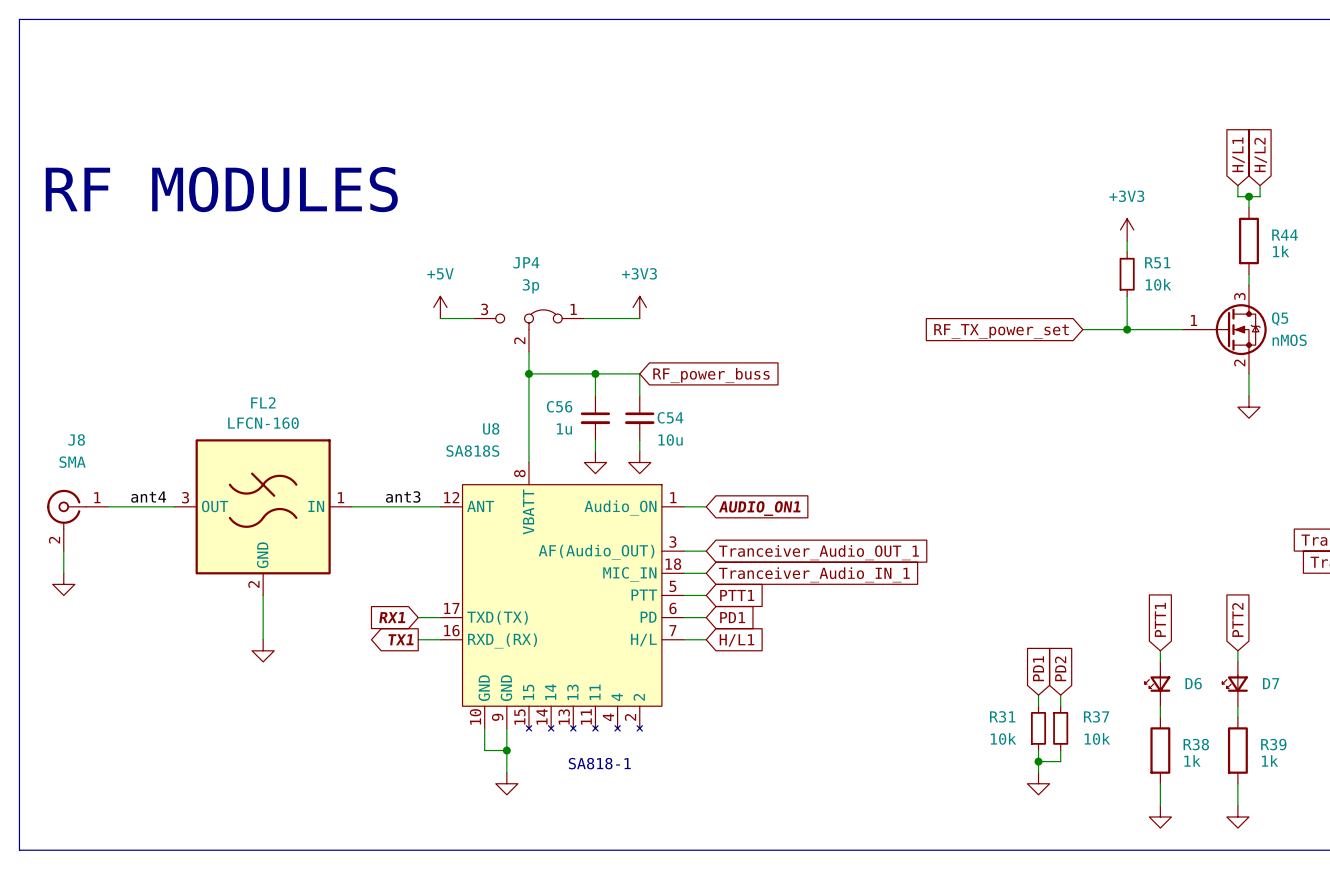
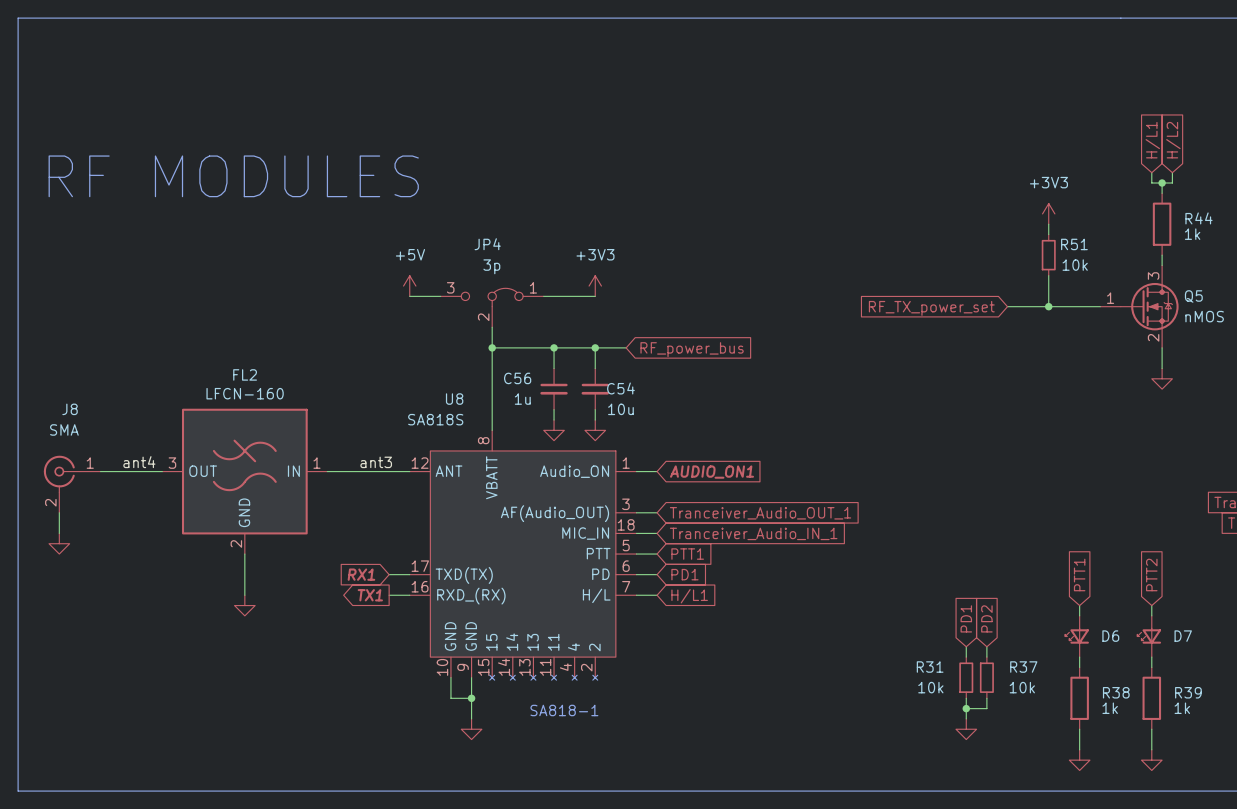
wire: none -> (595, 347) (626, 347)
junction: none -> (595, 347)
global label: RF_power_buss (711, 375) -> RF_power_bus (692, 349)

